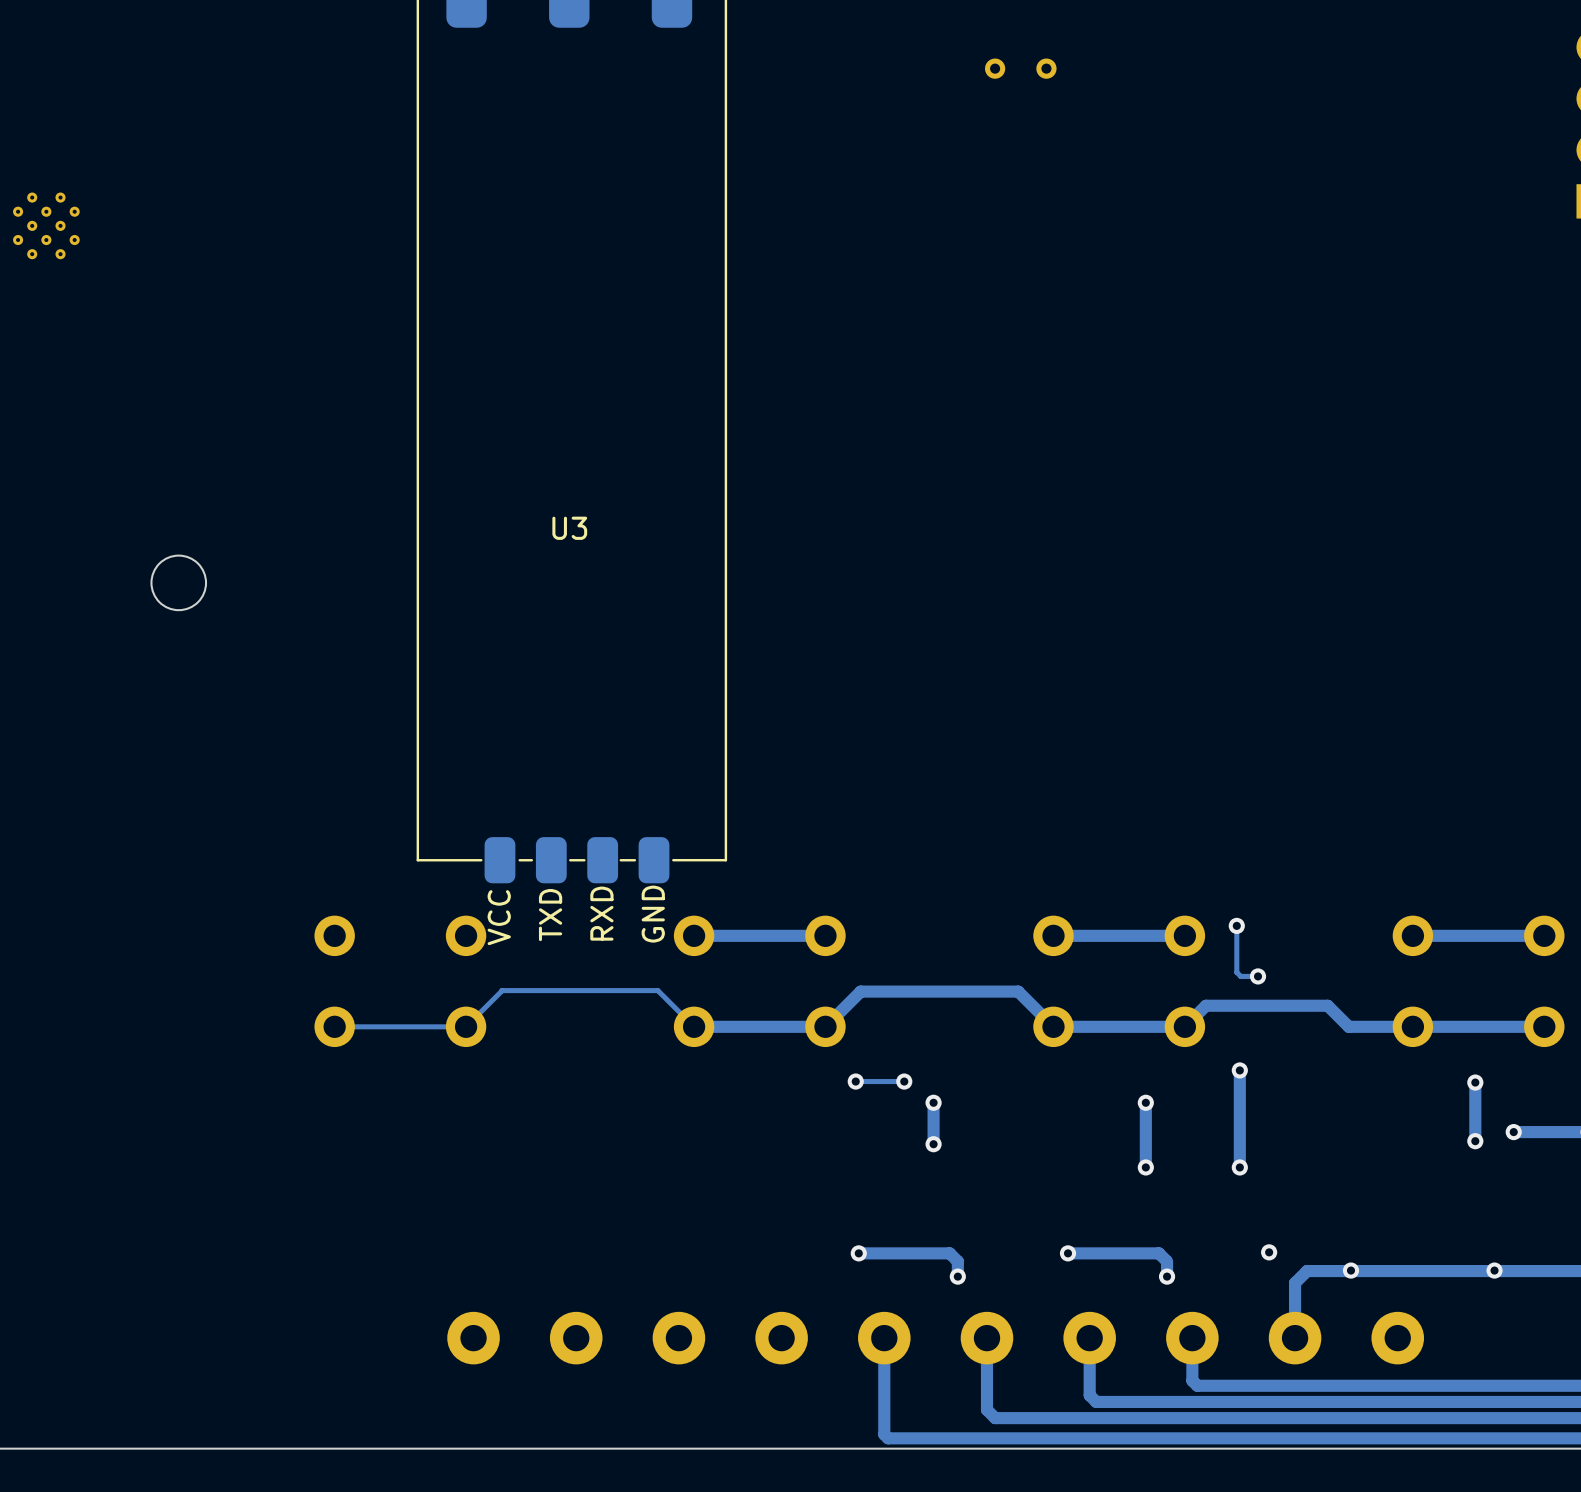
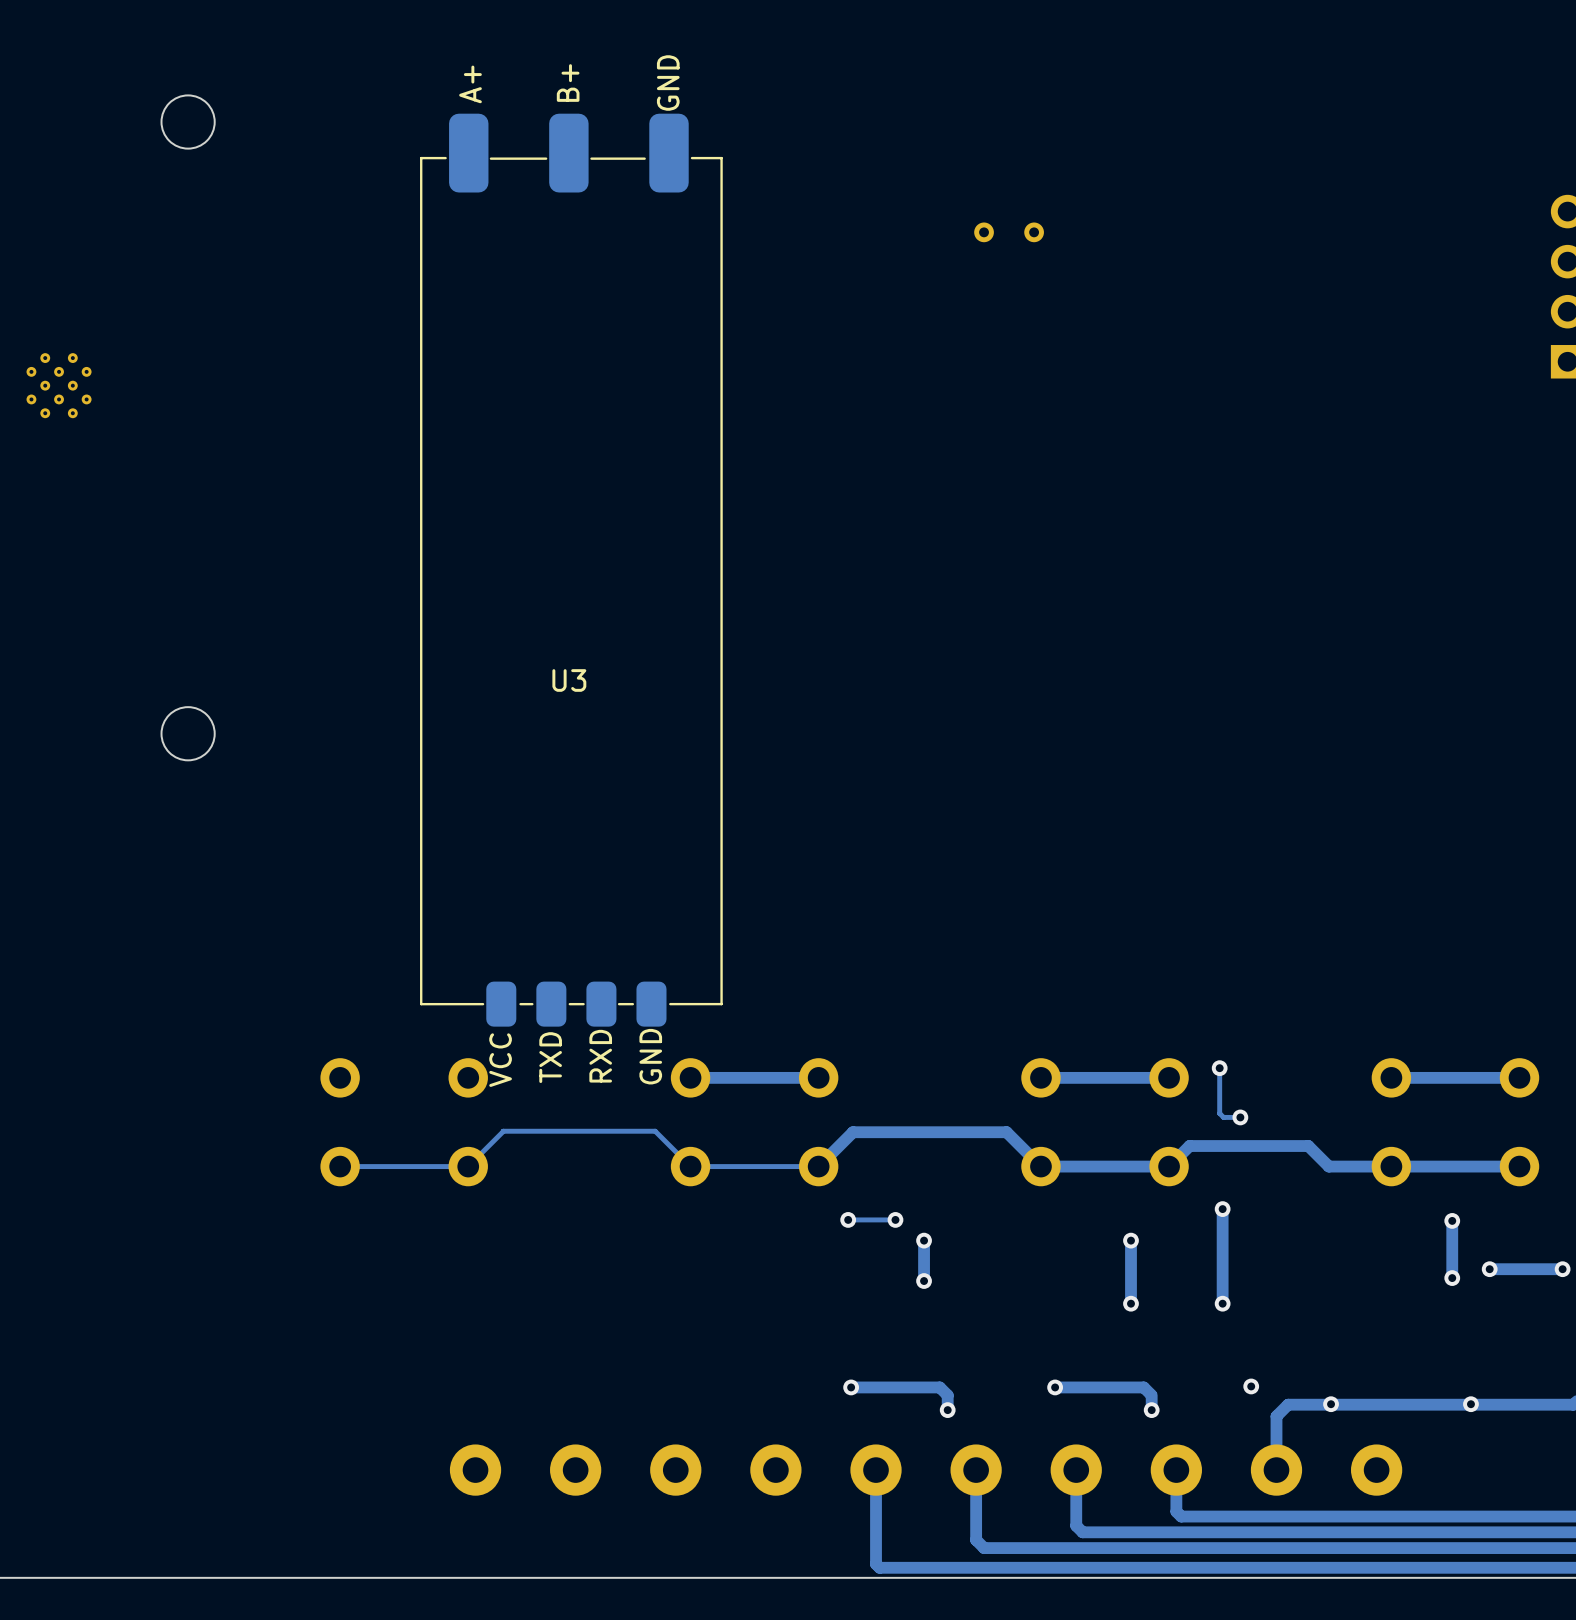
track width: thick (825, 1026) (694, 1026) -> thin (818, 1166) (690, 1166)

